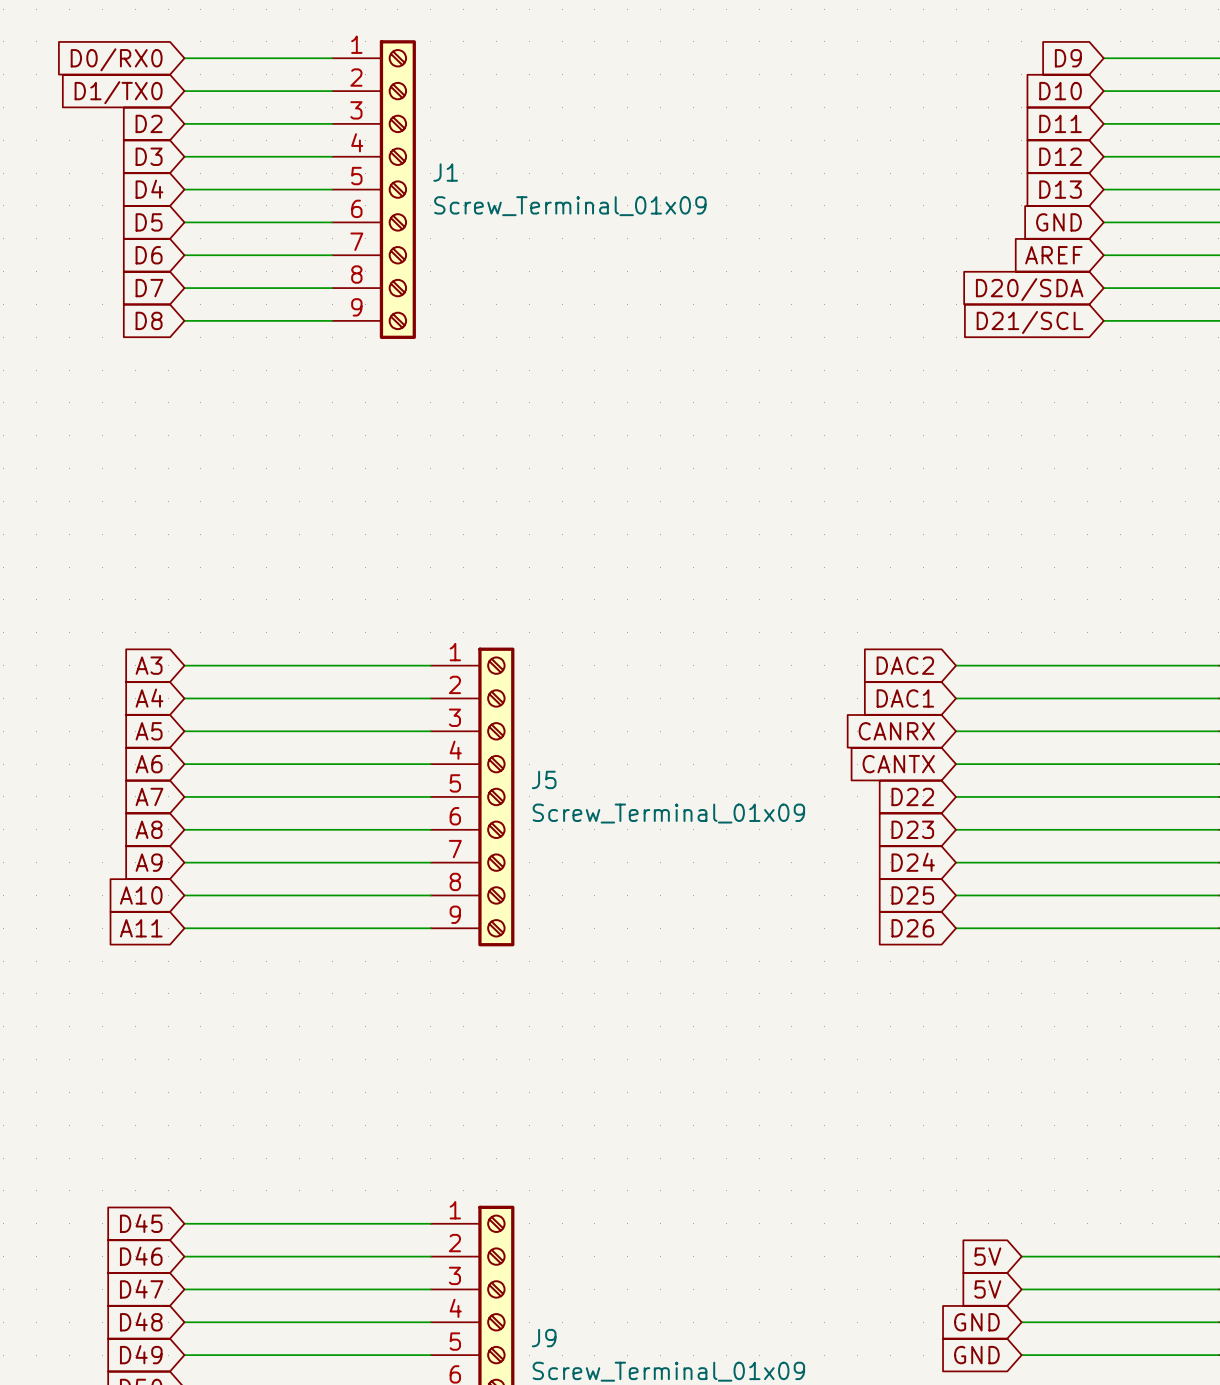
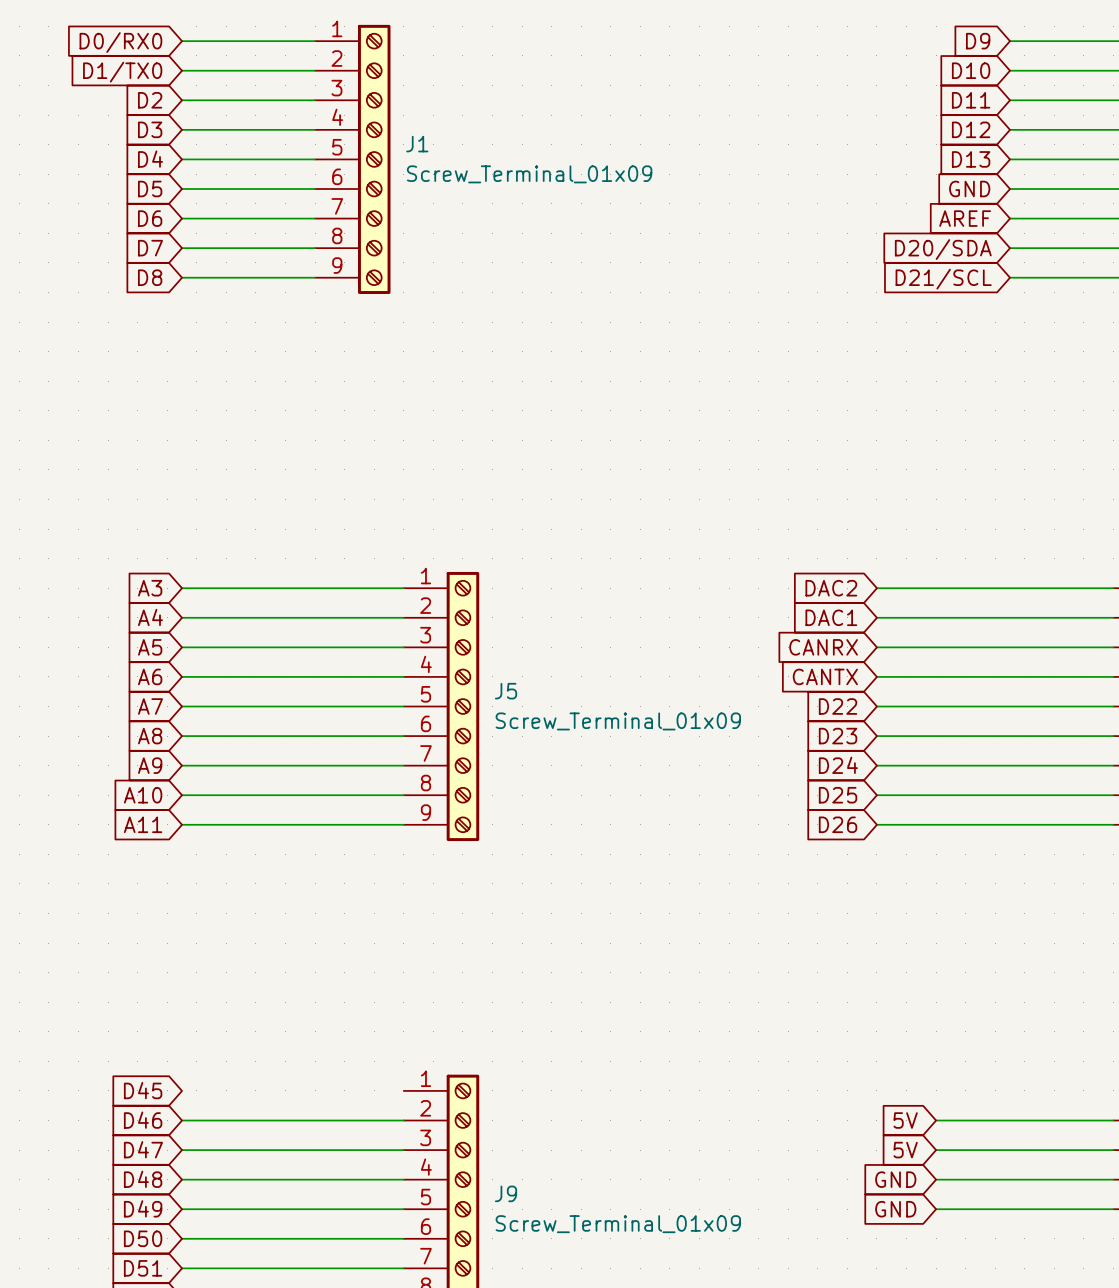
wire: (184, 1223) (430, 1223) -> none

